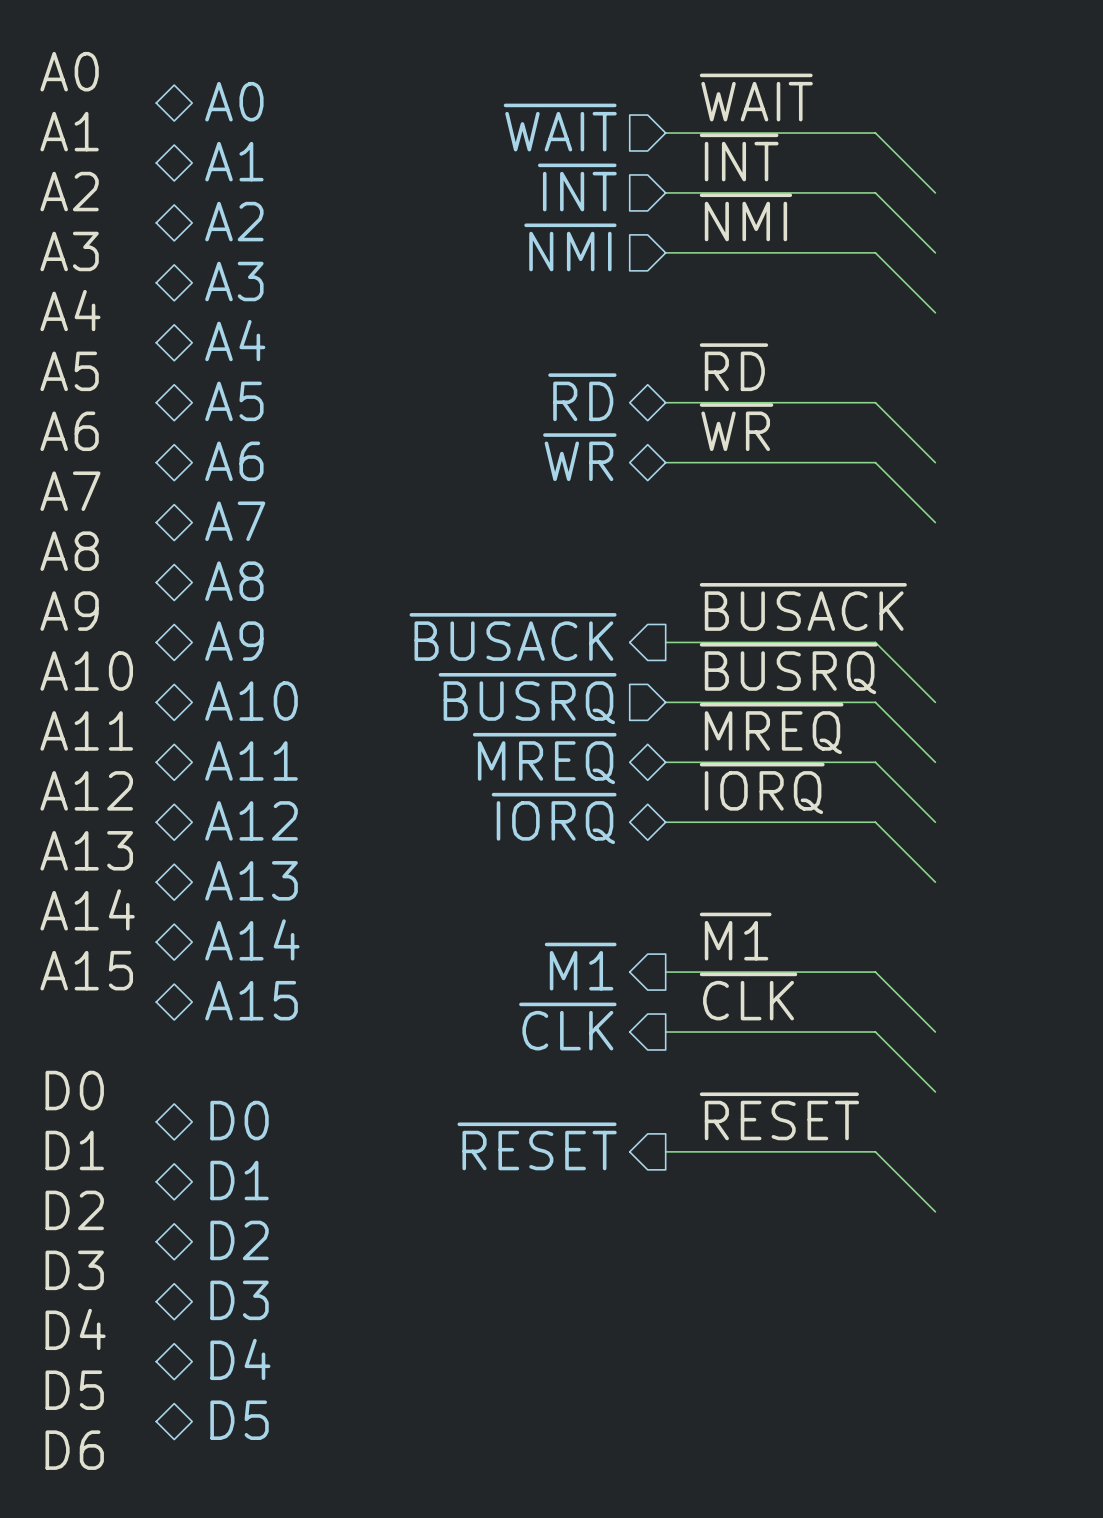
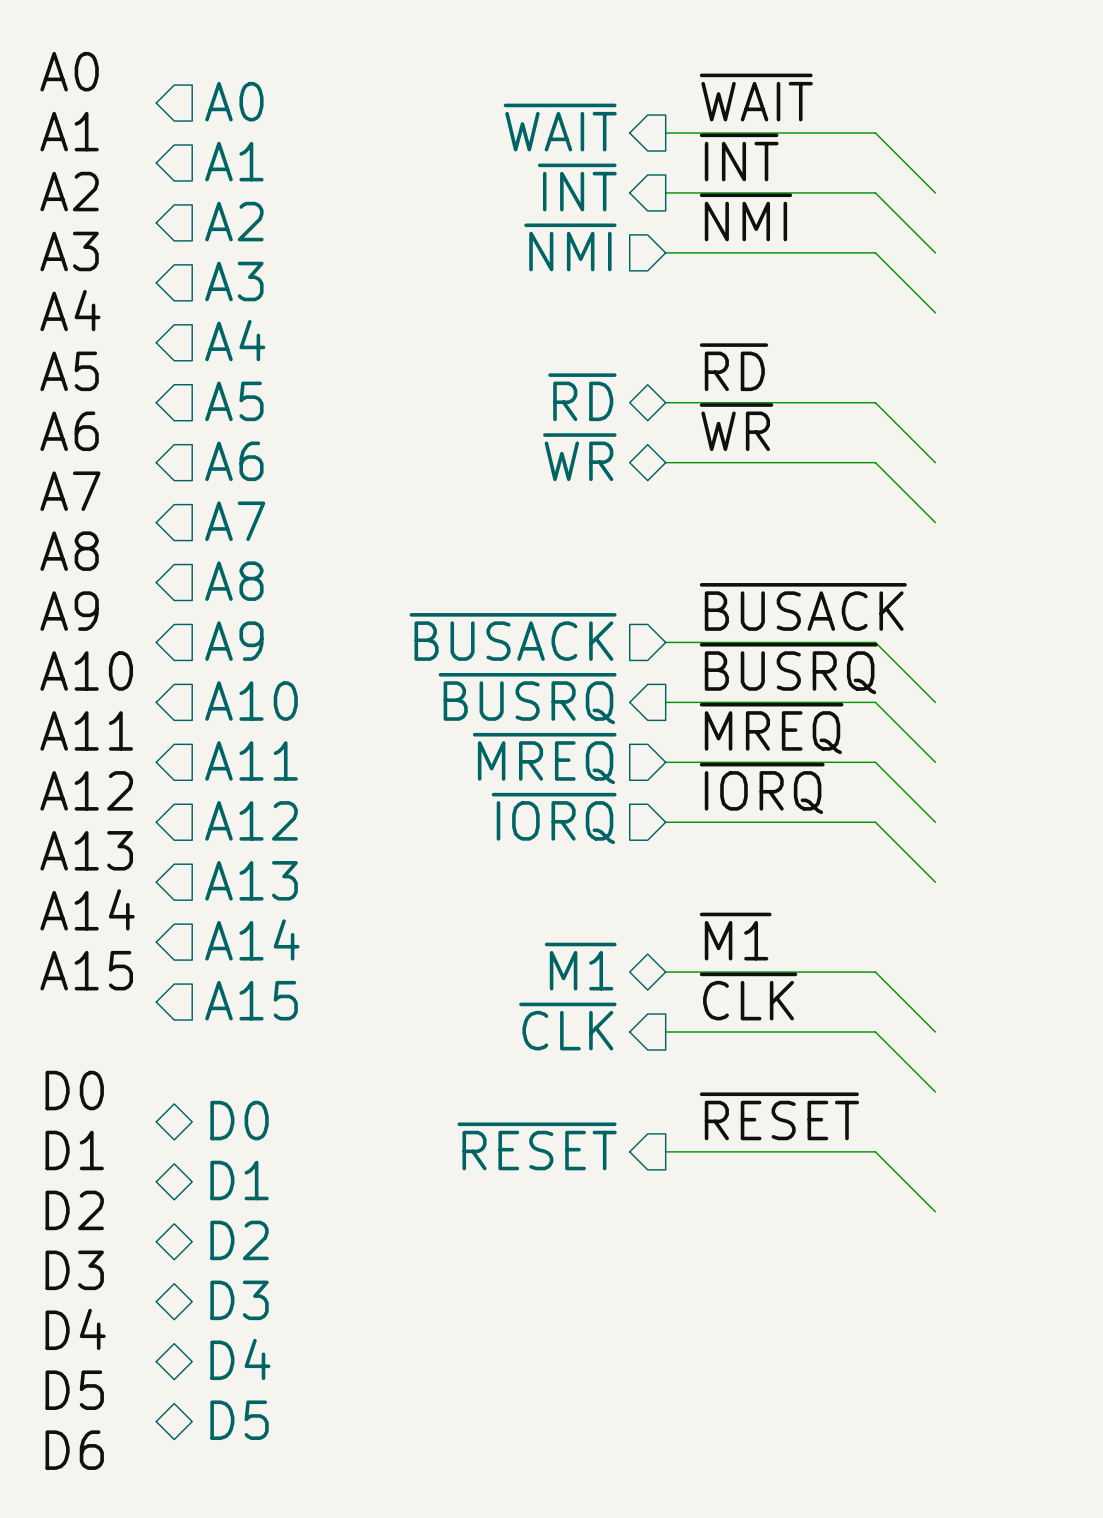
sheet pin shape: bidirectional (234, 101) -> output (234, 101)
sheet pin shape: output (560, 127) -> input (560, 127)
sheet pin shape: bidirectional (234, 161) -> output (234, 161)
sheet pin shape: output (577, 187) -> input (577, 187)
sheet pin shape: bidirectional (234, 221) -> output (234, 221)
sheet pin shape: bidirectional (234, 281) -> output (234, 281)
sheet pin shape: bidirectional (235, 340) -> output (235, 340)
sheet pin shape: bidirectional (234, 401) -> output (234, 401)
sheet pin shape: bidirectional (234, 461) -> output (234, 461)
sheet pin shape: bidirectional (235, 521) -> output (235, 521)
sheet pin shape: bidirectional (234, 581) -> output (234, 581)
sheet pin shape: input (513, 636) -> output (513, 636)
sheet pin shape: bidirectional (234, 641) -> output (234, 641)
sheet pin shape: output (527, 698) -> input (527, 698)
sheet pin shape: bidirectional (251, 701) -> output (251, 701)
sheet pin shape: bidirectional (544, 758) -> output (544, 758)
sheet pin shape: bidirectional (251, 760) -> output (251, 760)
sheet pin shape: bidirectional (554, 818) -> output (554, 818)
sheet pin shape: bidirectional (251, 820) -> output (251, 820)
sheet pin shape: bidirectional (251, 880) -> output (251, 880)
sheet pin shape: bidirectional (252, 939) -> output (252, 939)
sheet pin shape: input (580, 966) -> bidirectional (580, 966)
sheet pin shape: bidirectional (251, 1000) -> output (251, 1000)

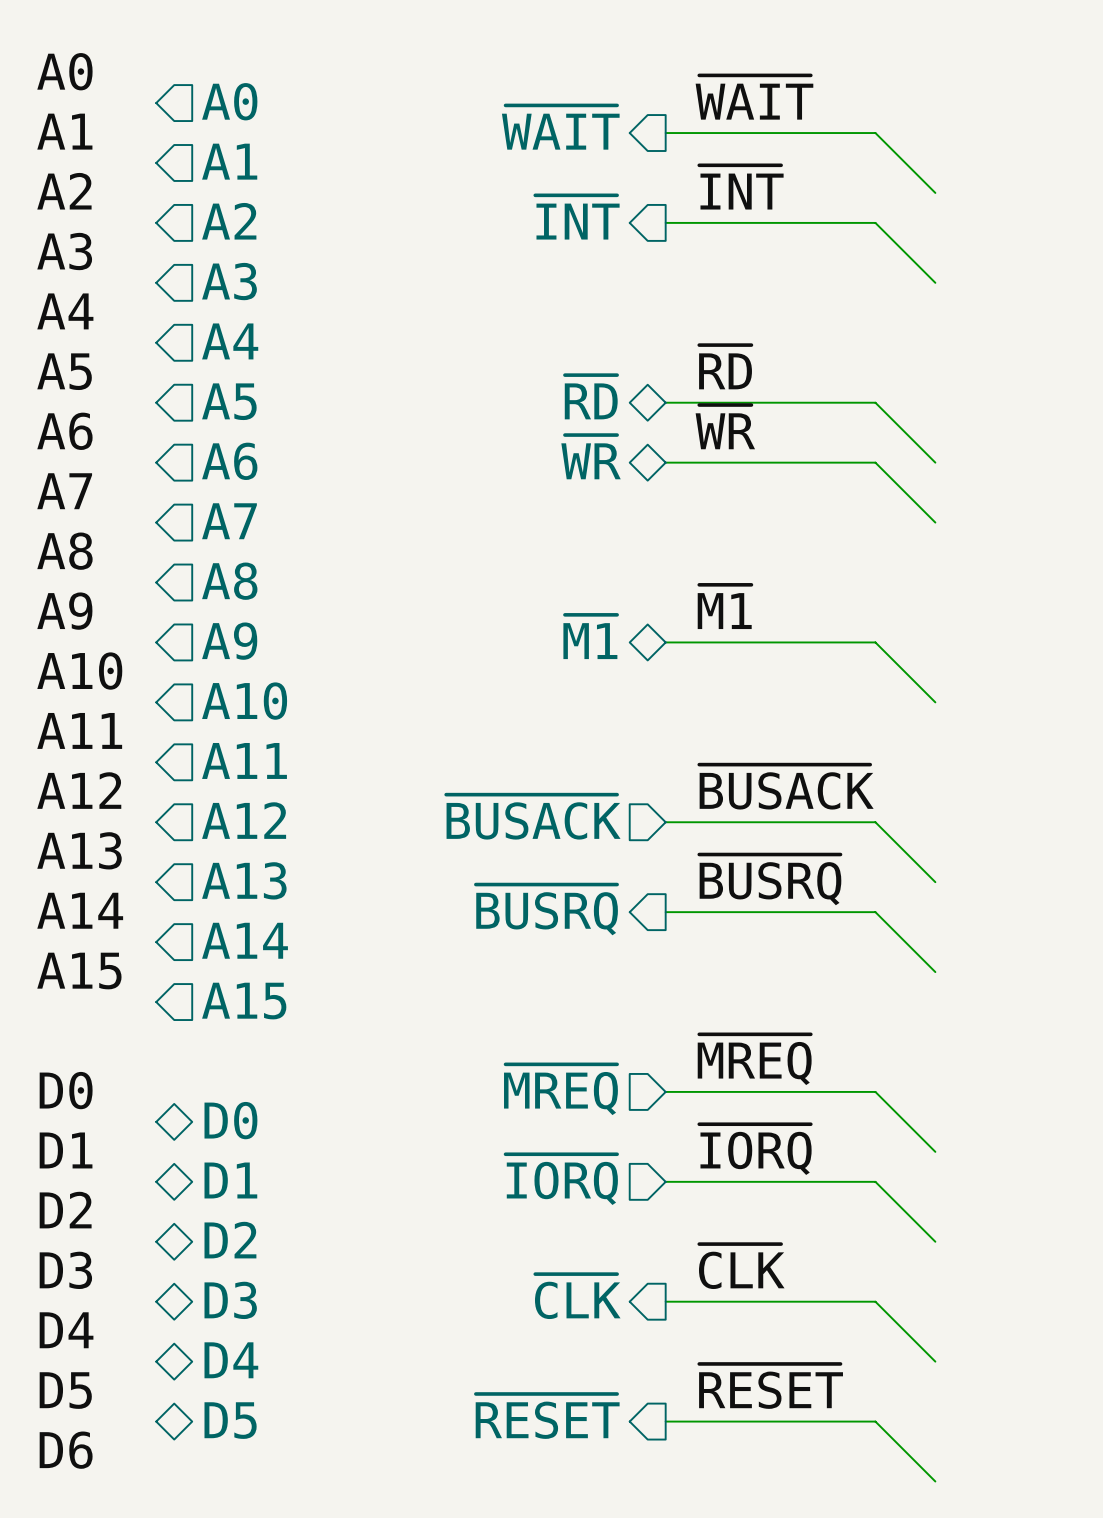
label position: ~{INT} (739, 157) -> ~{INT} (741, 187)
sheet pin position: ~{INT} (577, 187) -> ~{INT} (577, 217)
wire: (665, 192) (875, 192) (935, 252) -> (665, 222) (875, 222) (935, 282)
label: ~{NMI} (745, 217) -> none
sheet pin: ~{NMI} (570, 247) -> none
wire: (665, 252) (875, 252) (935, 312) -> none
label: ~{BUSACK} (803, 606) -> ~{M1} (724, 606)
sheet pin shape: output (513, 636) -> bidirectional (590, 636)
sheet pin: ~{BUSACK} (513, 636) -> ~{M1} (590, 636)
label position: ~{BUSRQ} (788, 668) -> ~{BUSRQ} (770, 879)
sheet pin position: ~{BUSRQ} (527, 698) -> ~{BUSRQ} (546, 909)
wire: (665, 702) (875, 702) (935, 762) -> (665, 1091) (875, 1091) (935, 1151)
label position: ~{MREQ} (771, 728) -> ~{MREQ} (754, 1059)
sheet pin position: ~{MREQ} (544, 758) -> ~{MREQ} (560, 1089)
wire: (665, 762) (875, 762) (935, 822) -> (665, 912) (875, 912) (935, 972)
label: ~{IORQ} (762, 788) -> ~{BUSACK} (786, 787)
sheet pin: ~{IORQ} (554, 818) -> ~{BUSACK} (533, 817)
label: ~{M1} (735, 936) -> none
sheet pin: ~{M1} (580, 966) -> none
wire: (665, 972) (875, 972) (935, 1032) -> (665, 1421) (875, 1421) (935, 1481)
label position: ~{CLK} (748, 996) -> ~{CLK} (741, 1266)
sheet pin position: ~{CLK} (567, 1026) -> ~{CLK} (577, 1296)
wire: (665, 1032) (875, 1032) (935, 1091) -> (665, 1181) (875, 1181) (935, 1241)
label position: ~{RESET} (779, 1116) -> ~{RESET} (771, 1386)
sheet pin position: ~{RESET} (537, 1146) -> ~{RESET} (547, 1416)
label: none -> ~{IORQ} (755, 1149)
wire: (665, 1151) (875, 1151) (935, 1211) -> (665, 1301) (875, 1301) (935, 1361)
sheet pin: none -> ~{IORQ} (561, 1179)

